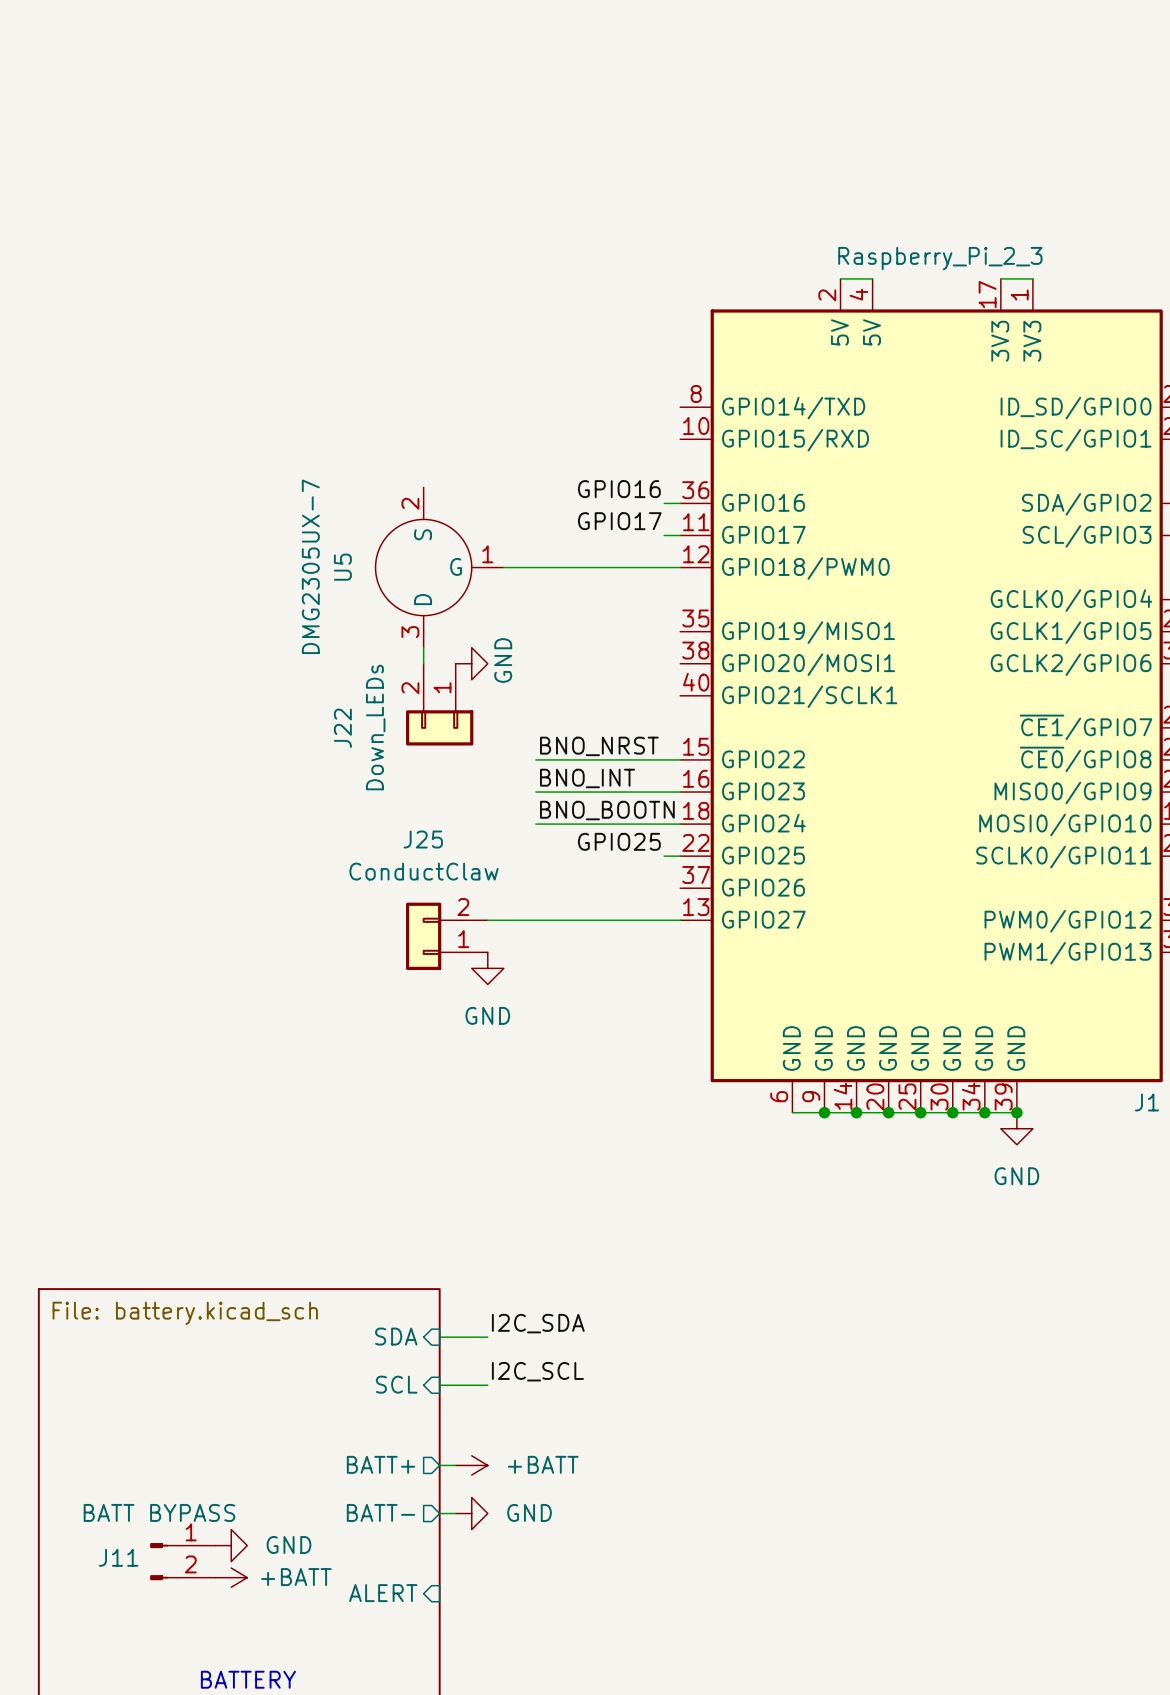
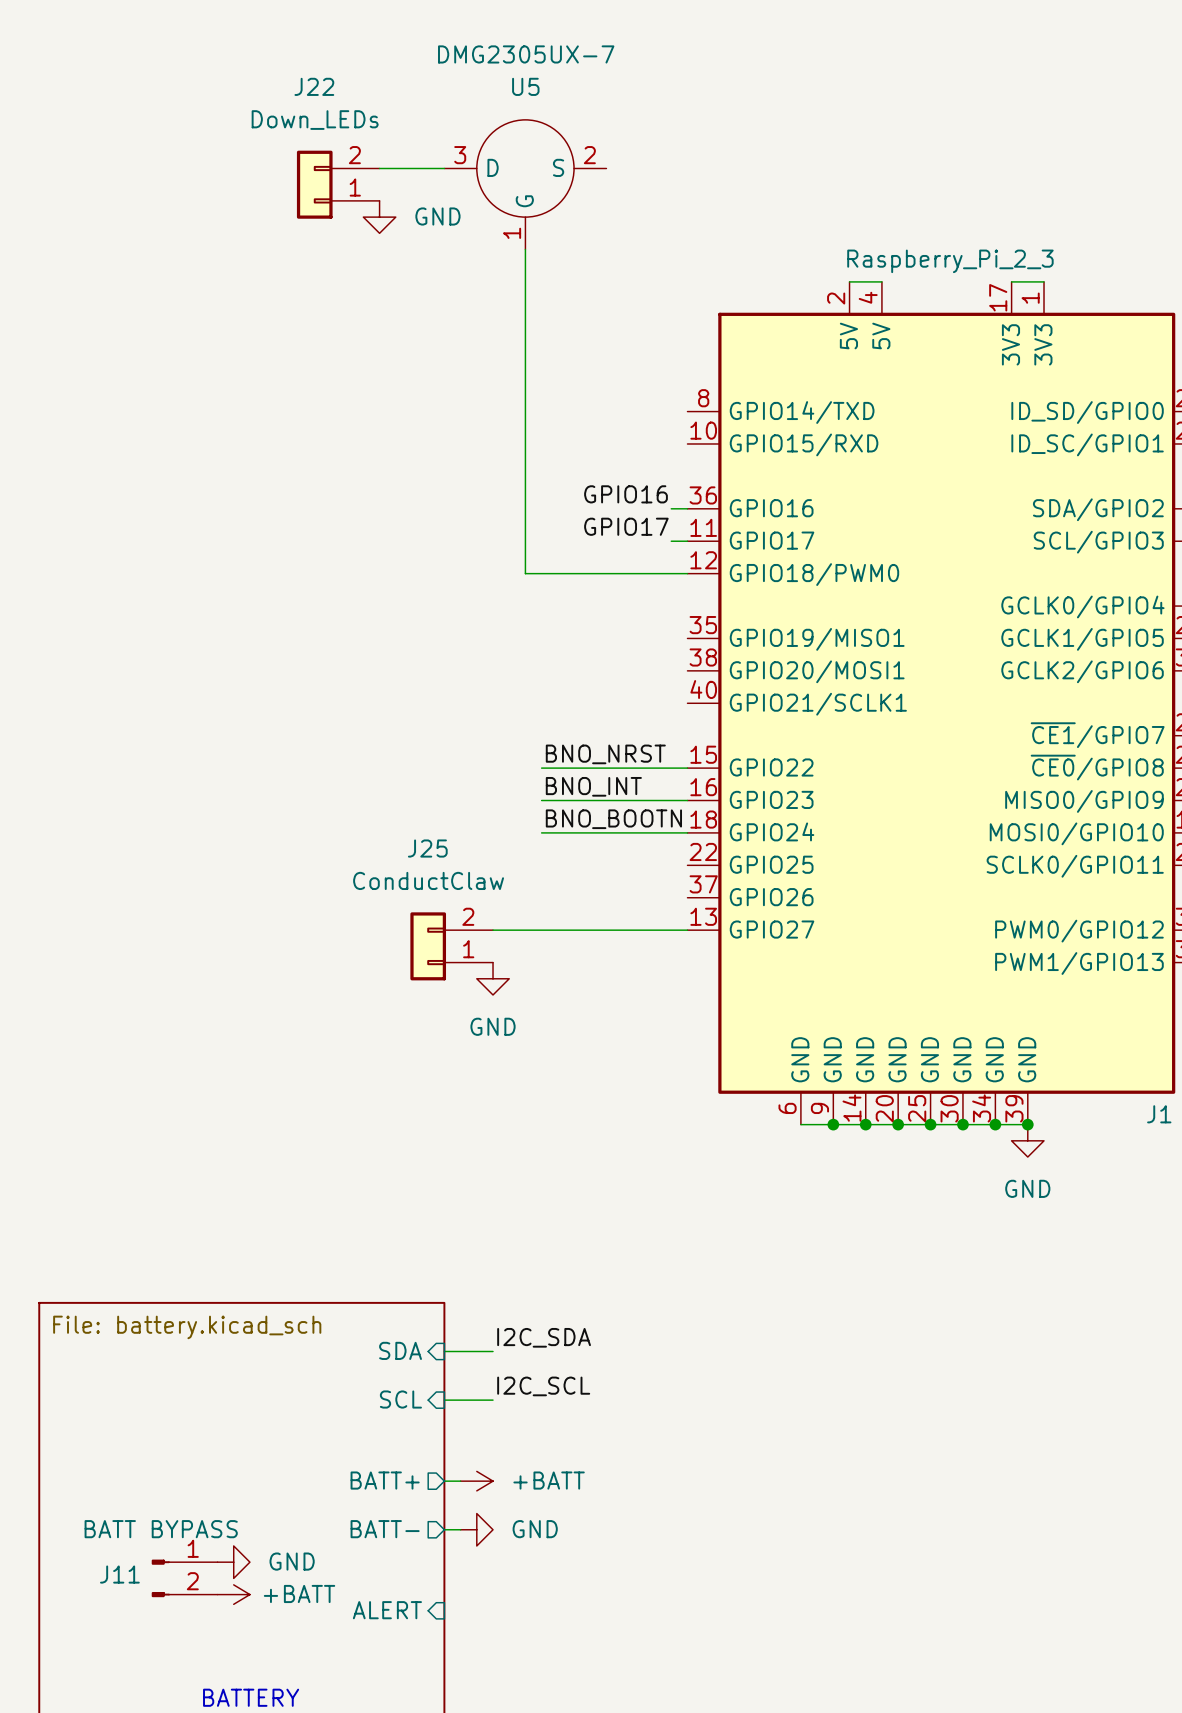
wire: none -> (379, 168) (444, 168)
power symbol: none -> GND (379, 217)
U5 rotation: 0° (423, 567) -> 90° clockwise (525, 168)
U5 position: (439, 567) -> (525, 184)
wire: (503, 567) (519, 567) -> (525, 249) (525, 573)
wire: (423, 647) (423, 663) -> none
power symbol: GND (471, 663) -> none
J22 position: (439, 704) -> (338, 184)
J22 rotation: 0° (439, 727) -> 90° clockwise (314, 184)
label: GPIO25 (619, 841) -> none
wire: (664, 856) (680, 856) -> none

